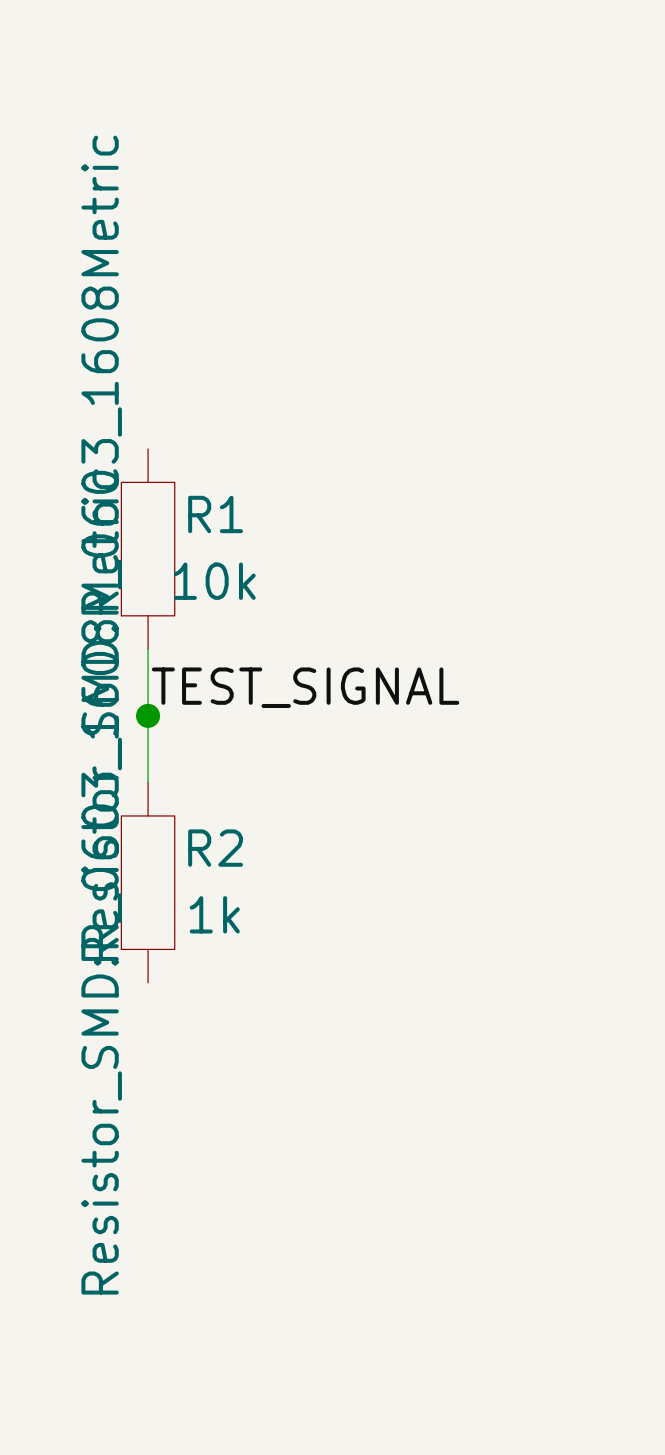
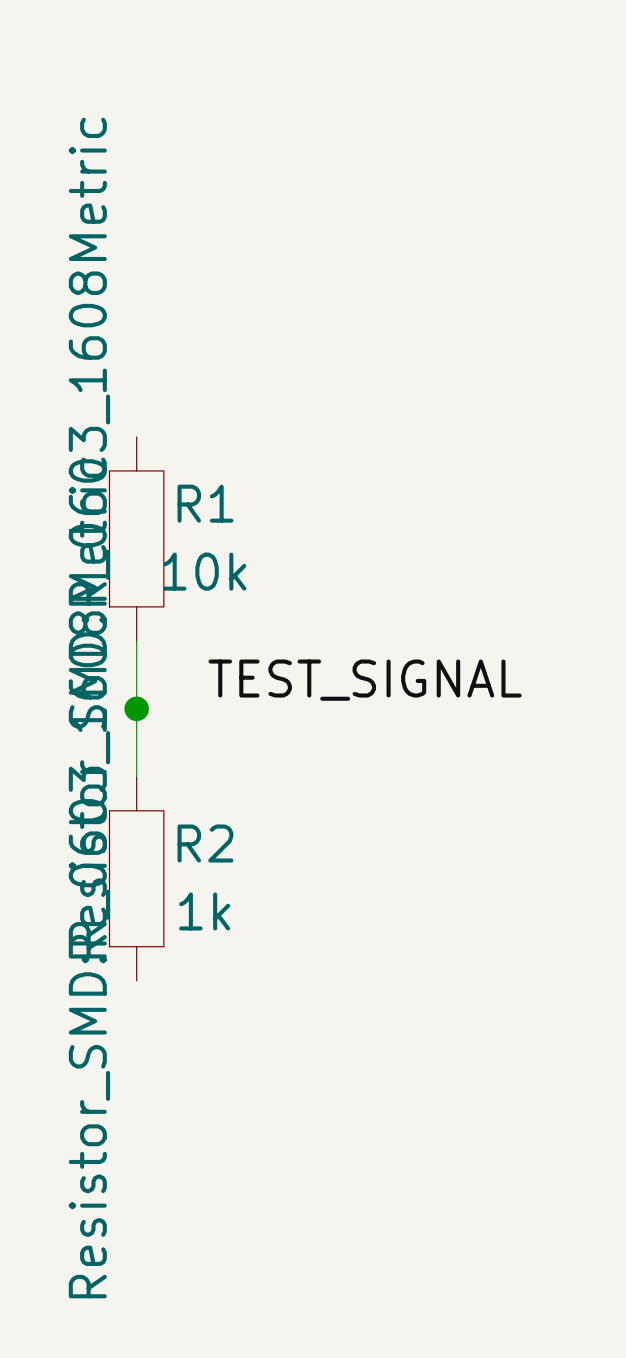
label position: TEST_SIGNAL (305, 687) -> TEST_SIGNAL (365, 680)

